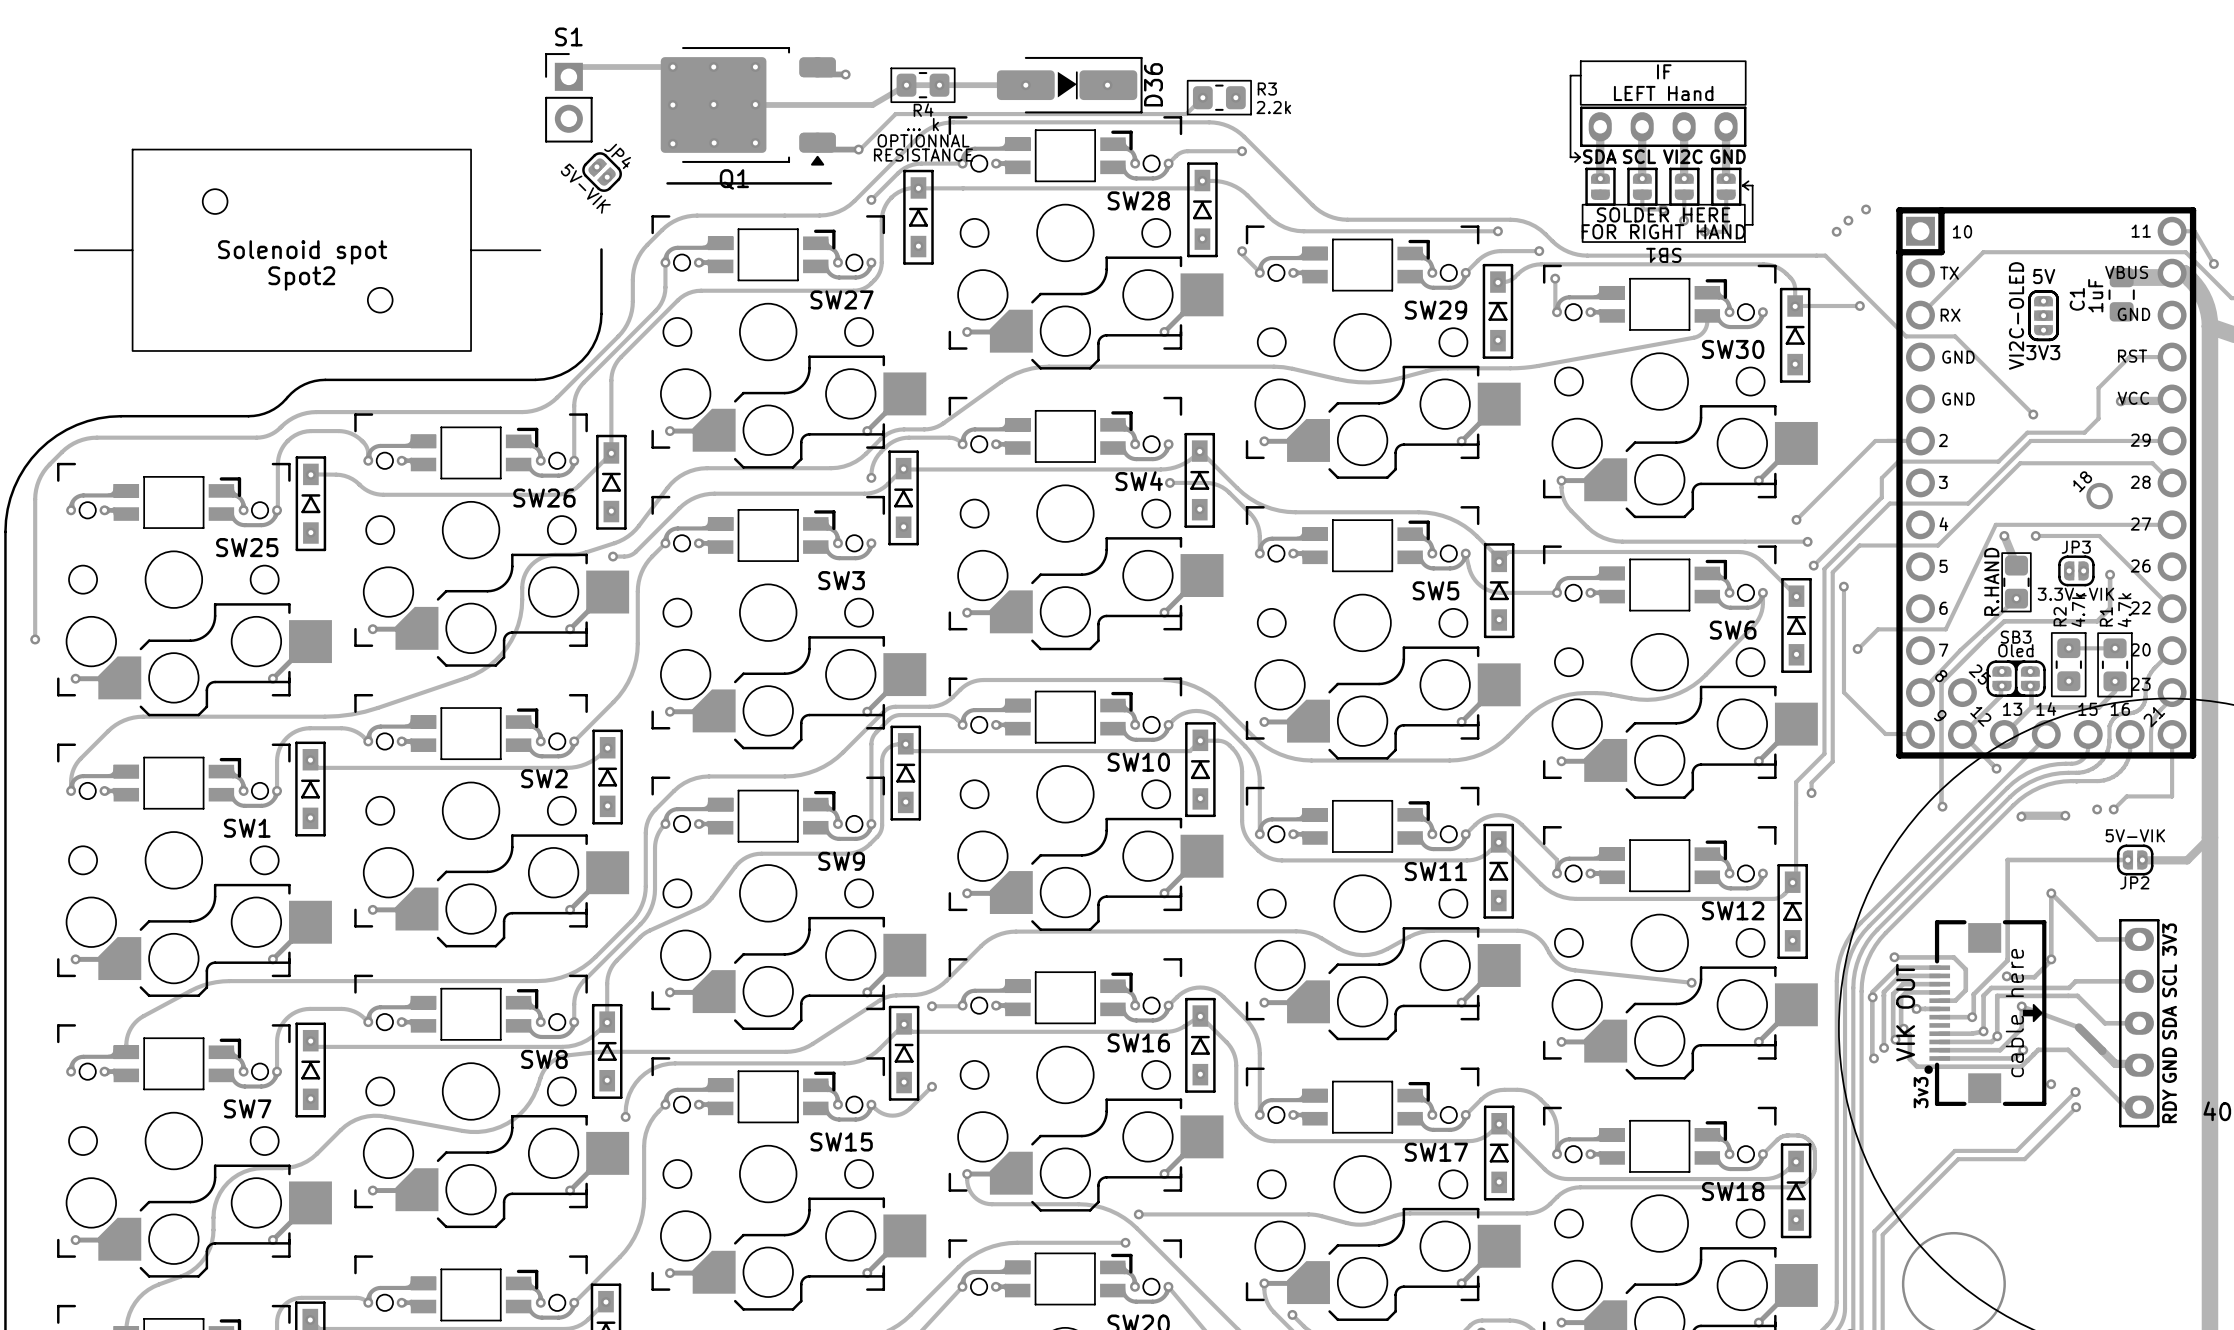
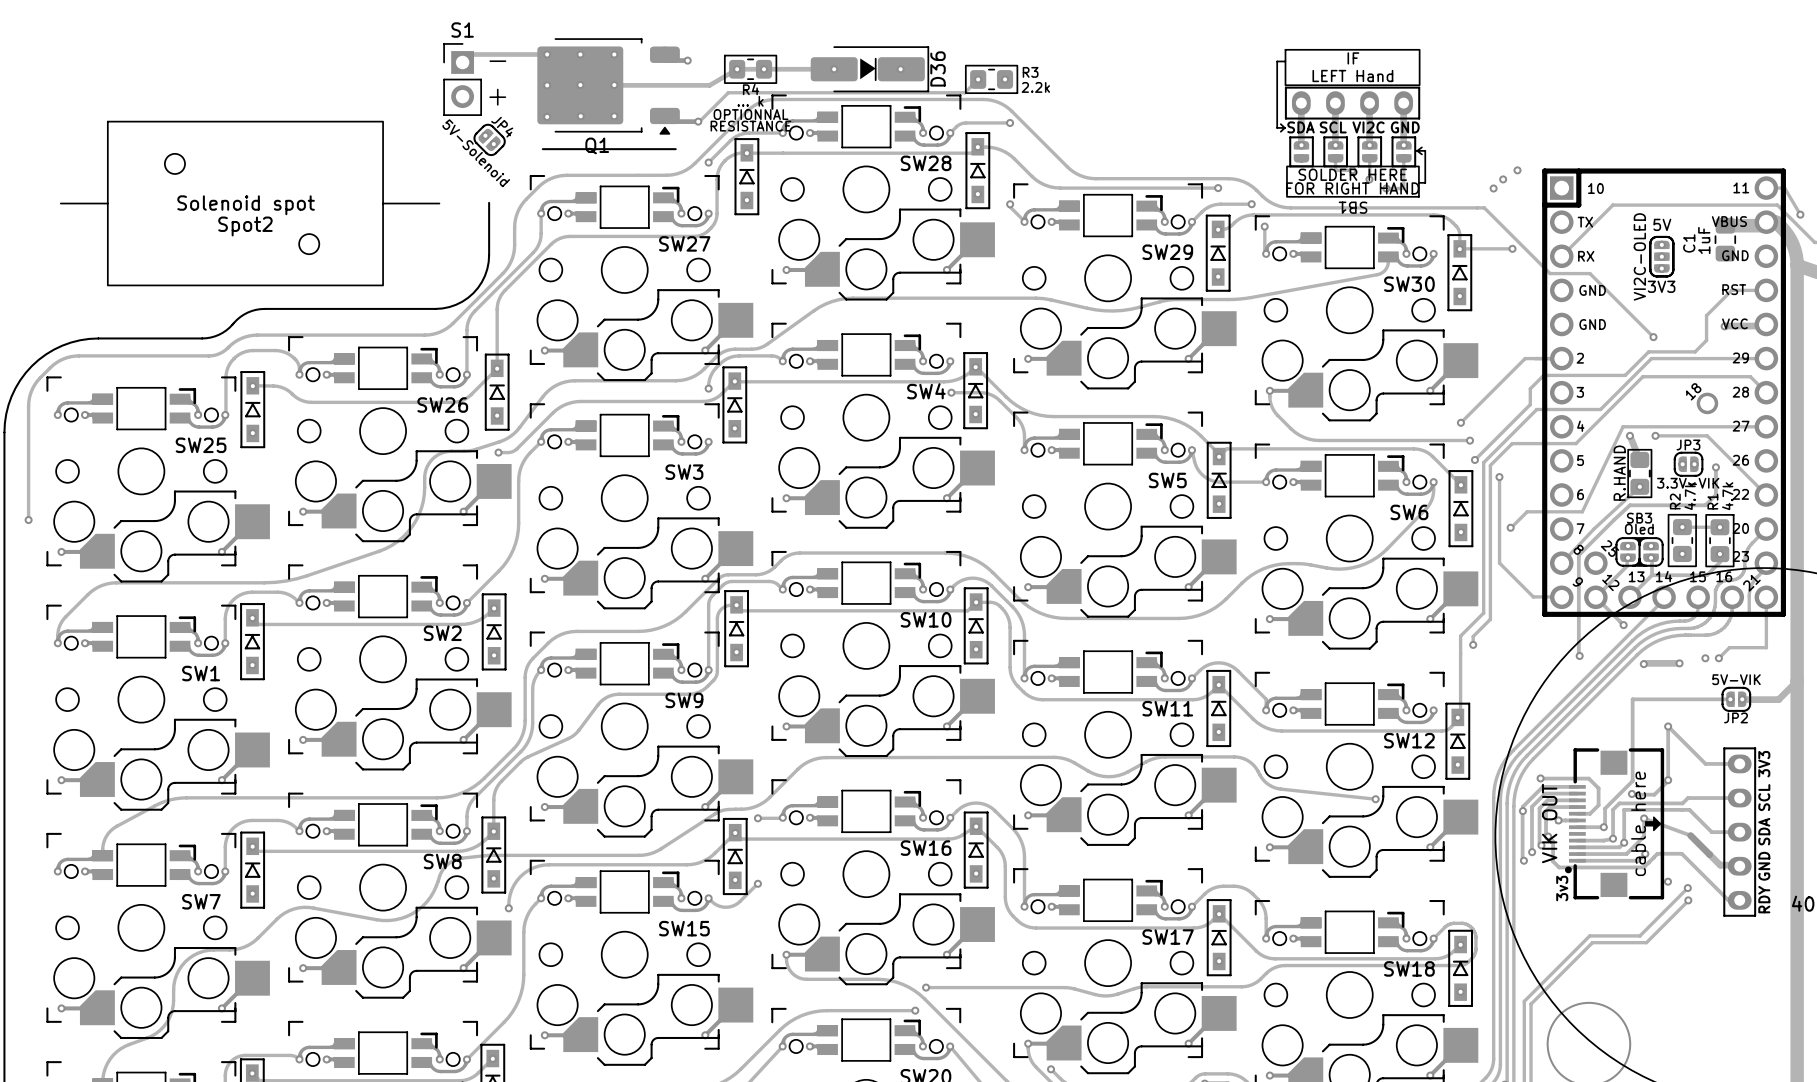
S1 text: none -> - (497, 61)
S1 text: none -> + (497, 97)
JP4 value: 5V-VIK (585, 188) -> 5V-Solenoid (476, 153)

